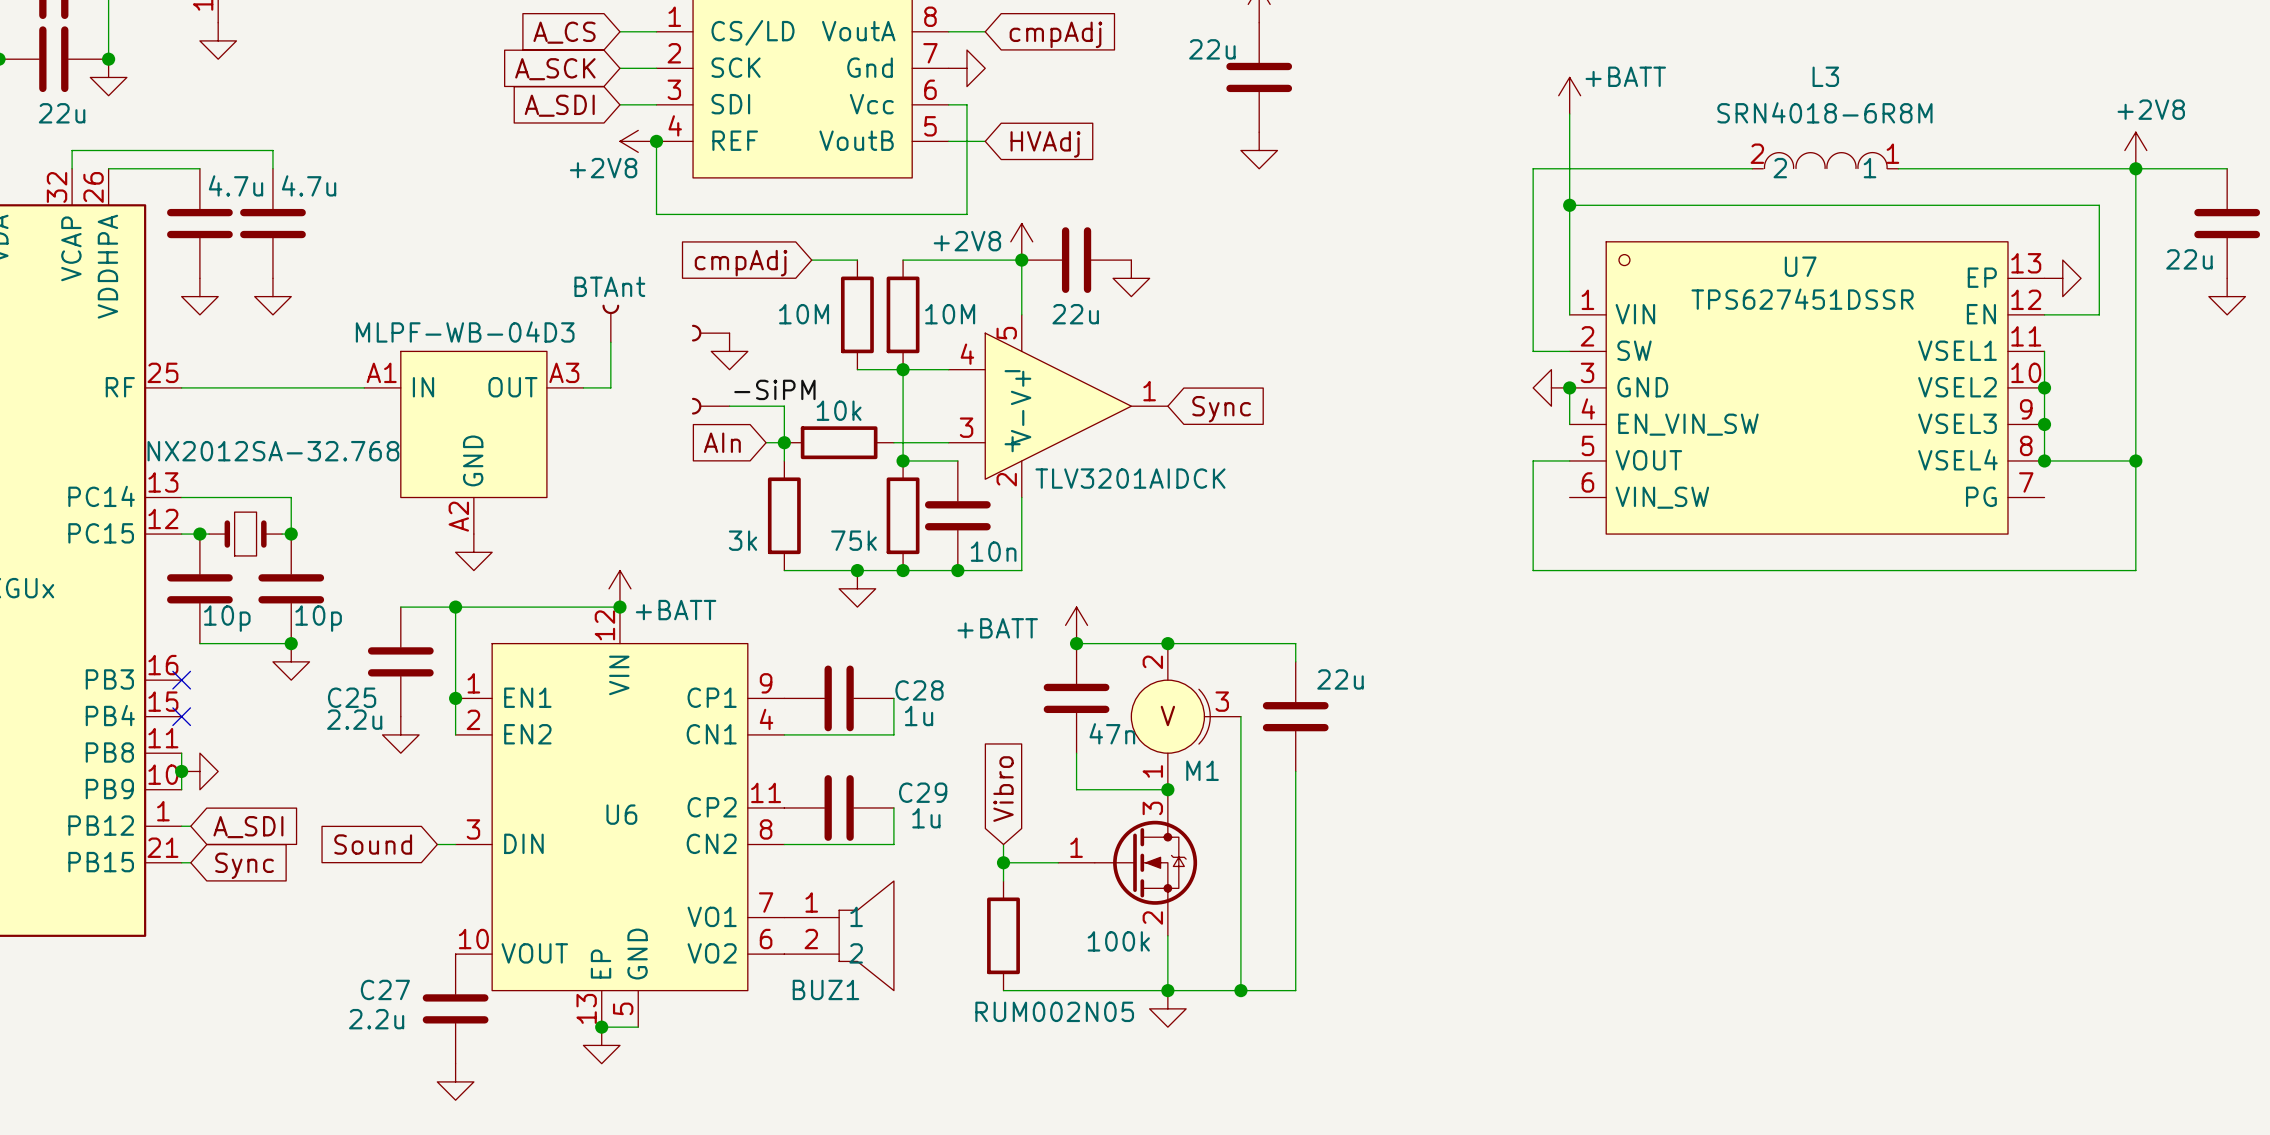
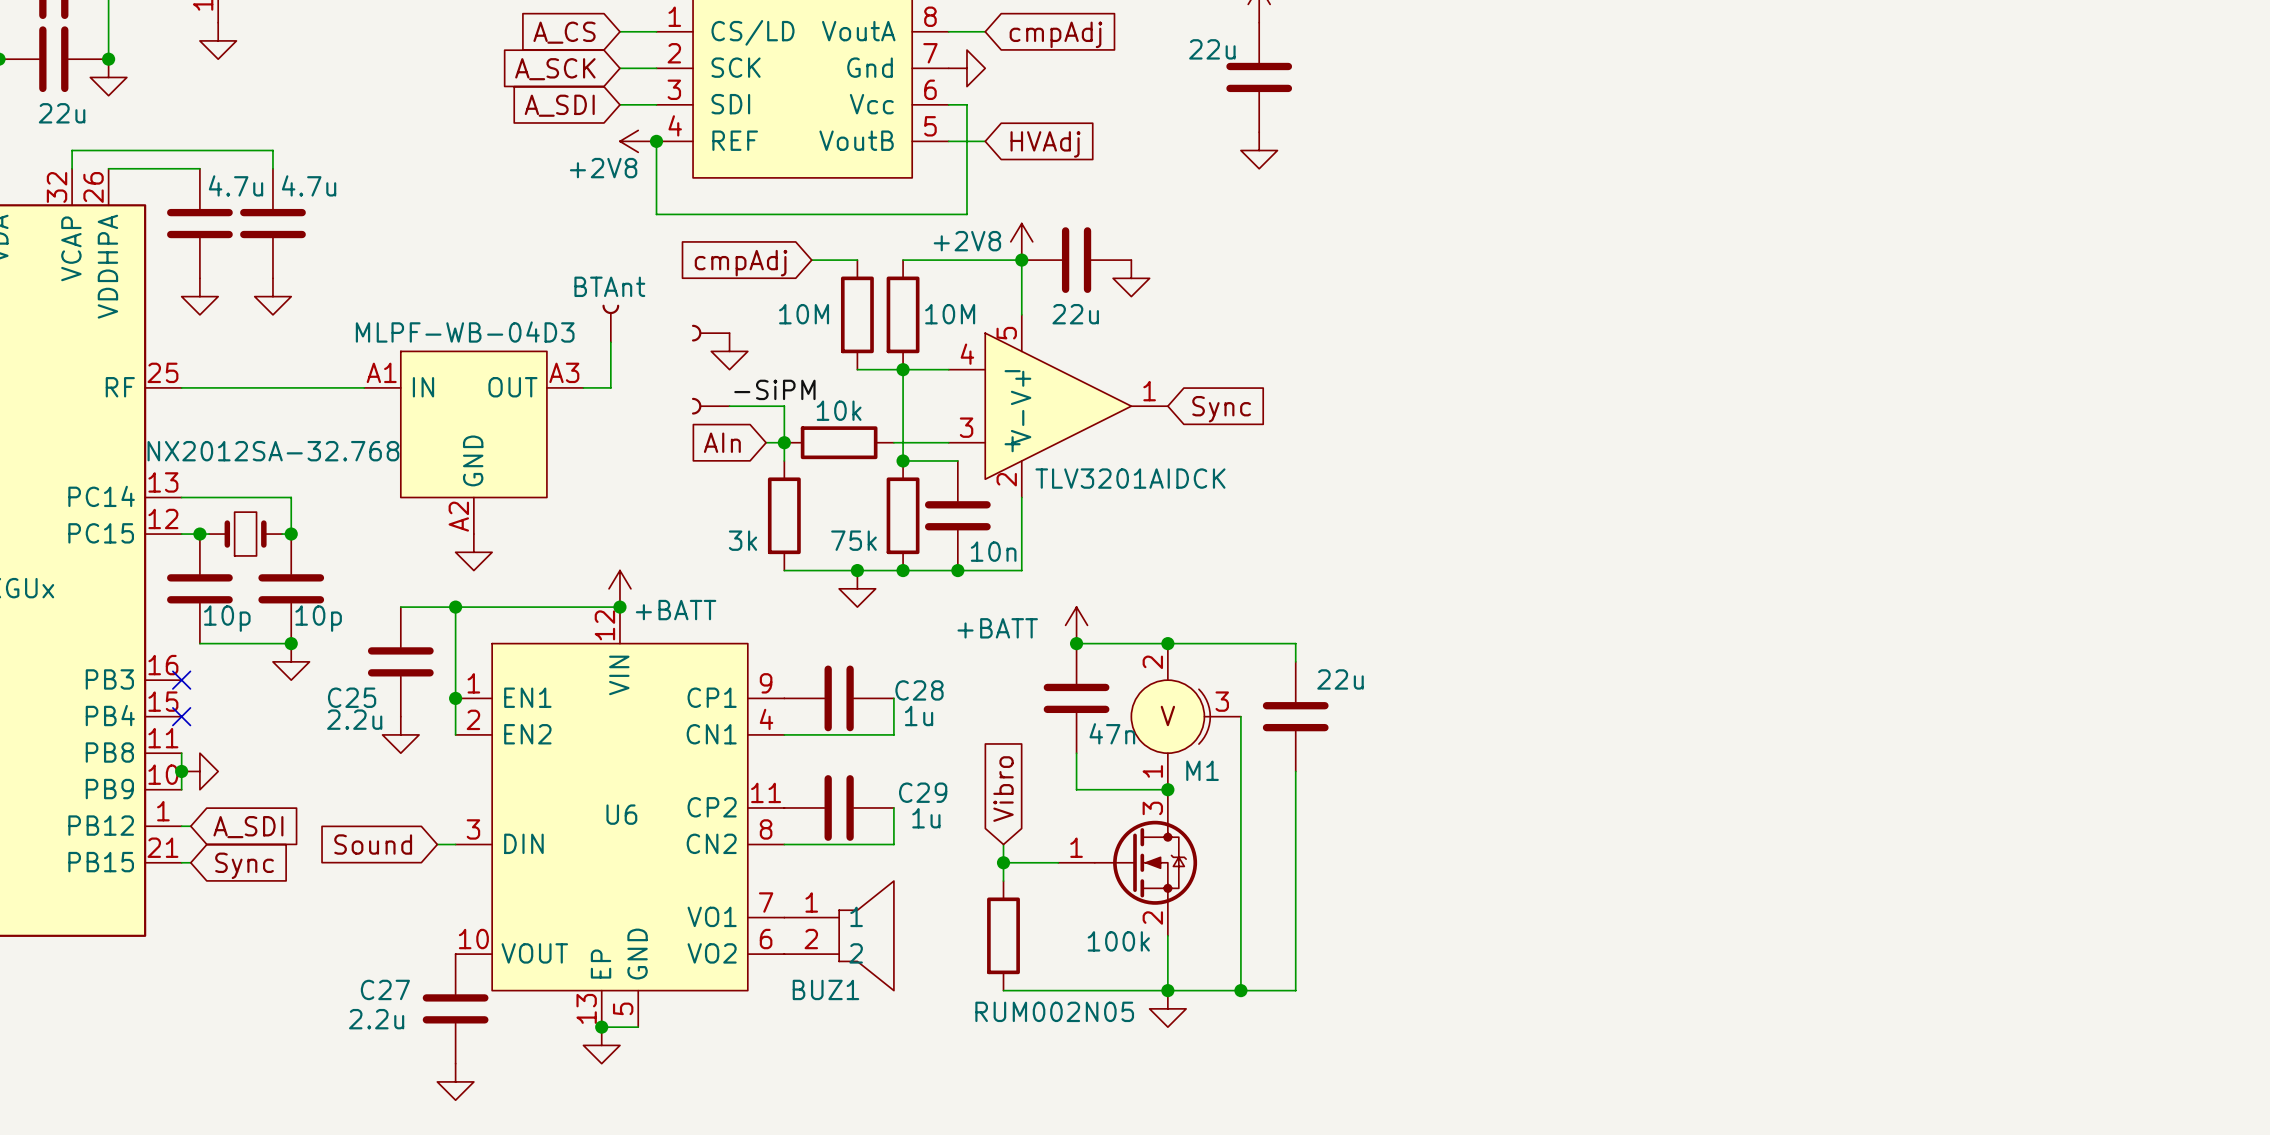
power symbol: +BATT (1569, 95) -> none
wire: (1569, 113) (1569, 314) -> none
power symbol: +2V8 (2135, 150) -> none
L3: SRN4018-6R8M (1825, 160) -> none
wire: (1752, 168) (1533, 168) (1533, 351) (1569, 351) -> none
wire: (1898, 168) (2227, 168) -> none
wire: (2135, 168) (2135, 570) (1533, 570) (1533, 460) (1569, 460) -> none
junction: (2135, 168) -> none
wire: (1569, 205) (2099, 205) (2099, 314) (2044, 314) -> none
junction: (1569, 205) -> none
part: 22u (2227, 223) -> none
power symbol: (2062, 278) -> none
power symbol: (2227, 296) -> none
wire: (2044, 351) (2044, 460) (2135, 460) -> none
power symbol: (1551, 387) -> none
wire: (1569, 387) (1569, 424) -> none
junction: (1569, 387) -> none
U7: TPS627451DSSR (1807, 387) -> none
junction: (2044, 387) -> none
junction: (2044, 424) -> none
junction: (2044, 460) -> none
junction: (2135, 460) -> none

